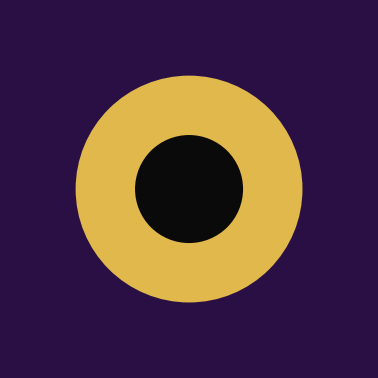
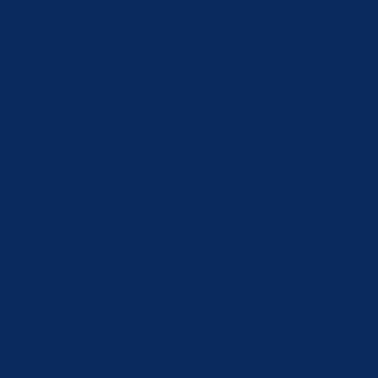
part: (189, 189) -> none

